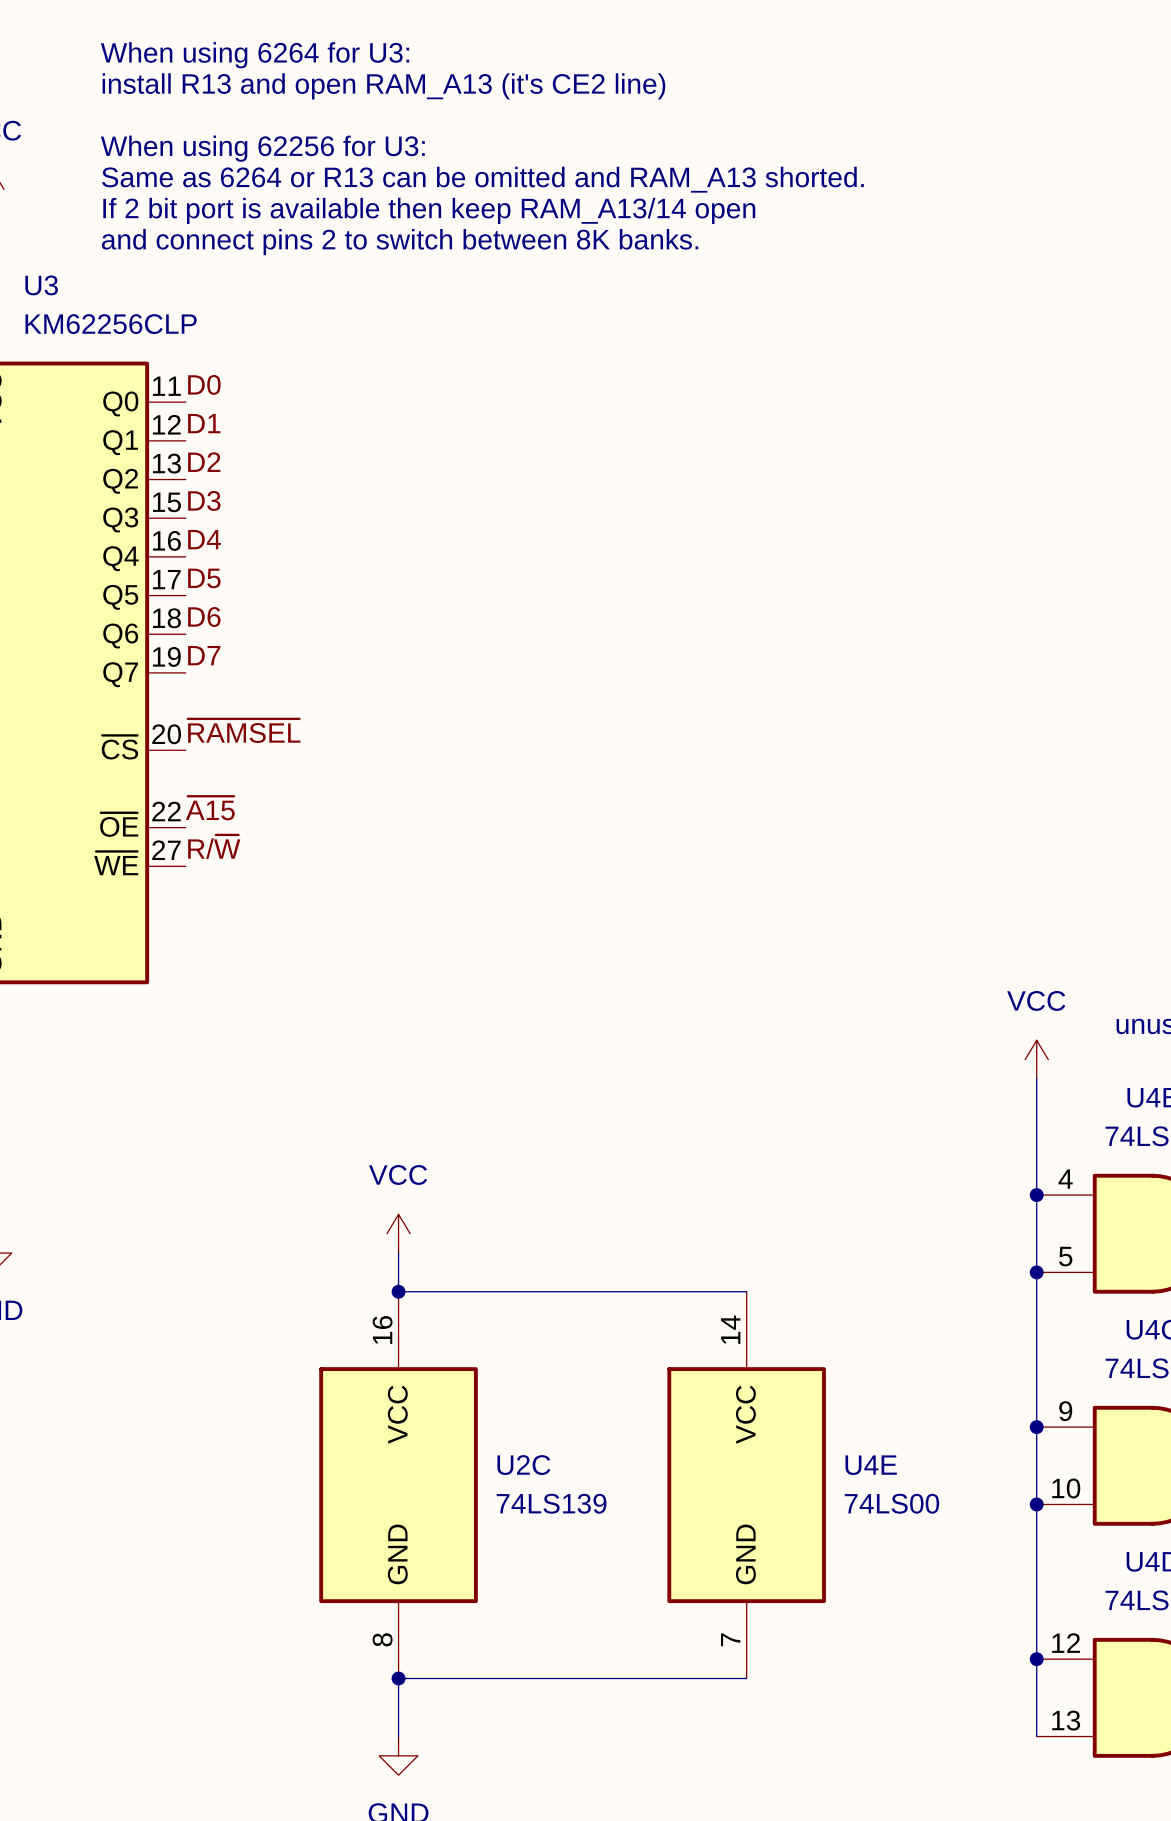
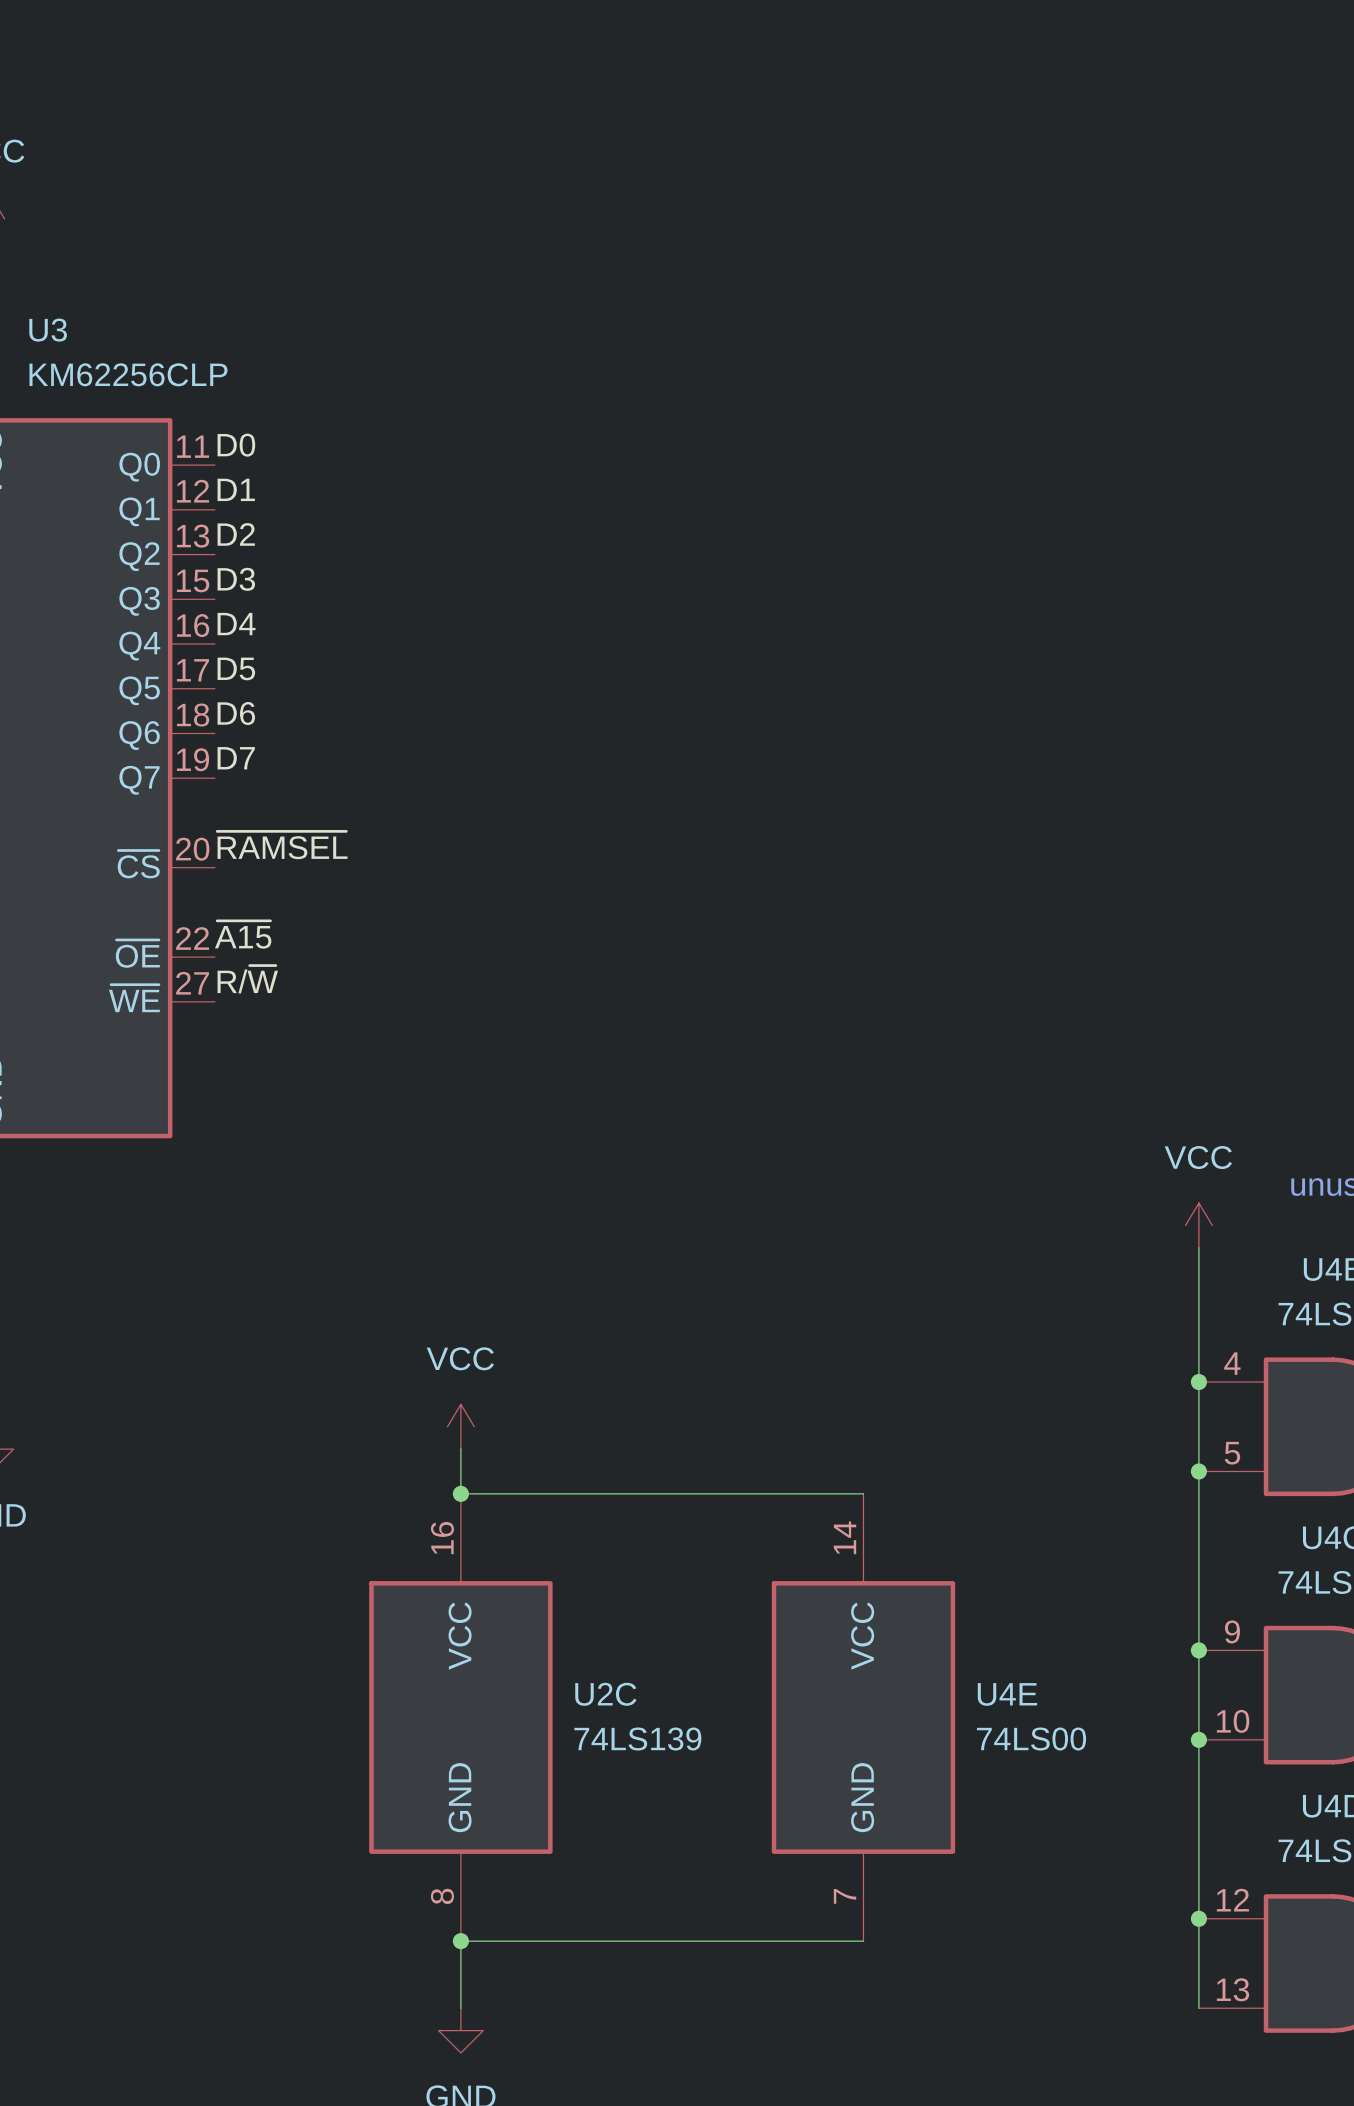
text: When using 6264 for U3: (254, 55) -> none
text: install R13 and open RAM_A13 (it's CE2 line) (383, 86) -> none
text: When using 62256 for U3: (262, 148) -> none
text: Same as 6264 or R13 can be omitted and RAM_A13 shorted. (482, 179) -> none
text: If 2 bit port is available then keep RAM_A13/14 open (429, 210) -> none
text: and connect pins 2 to switch between 8K banks. (400, 242) -> none

